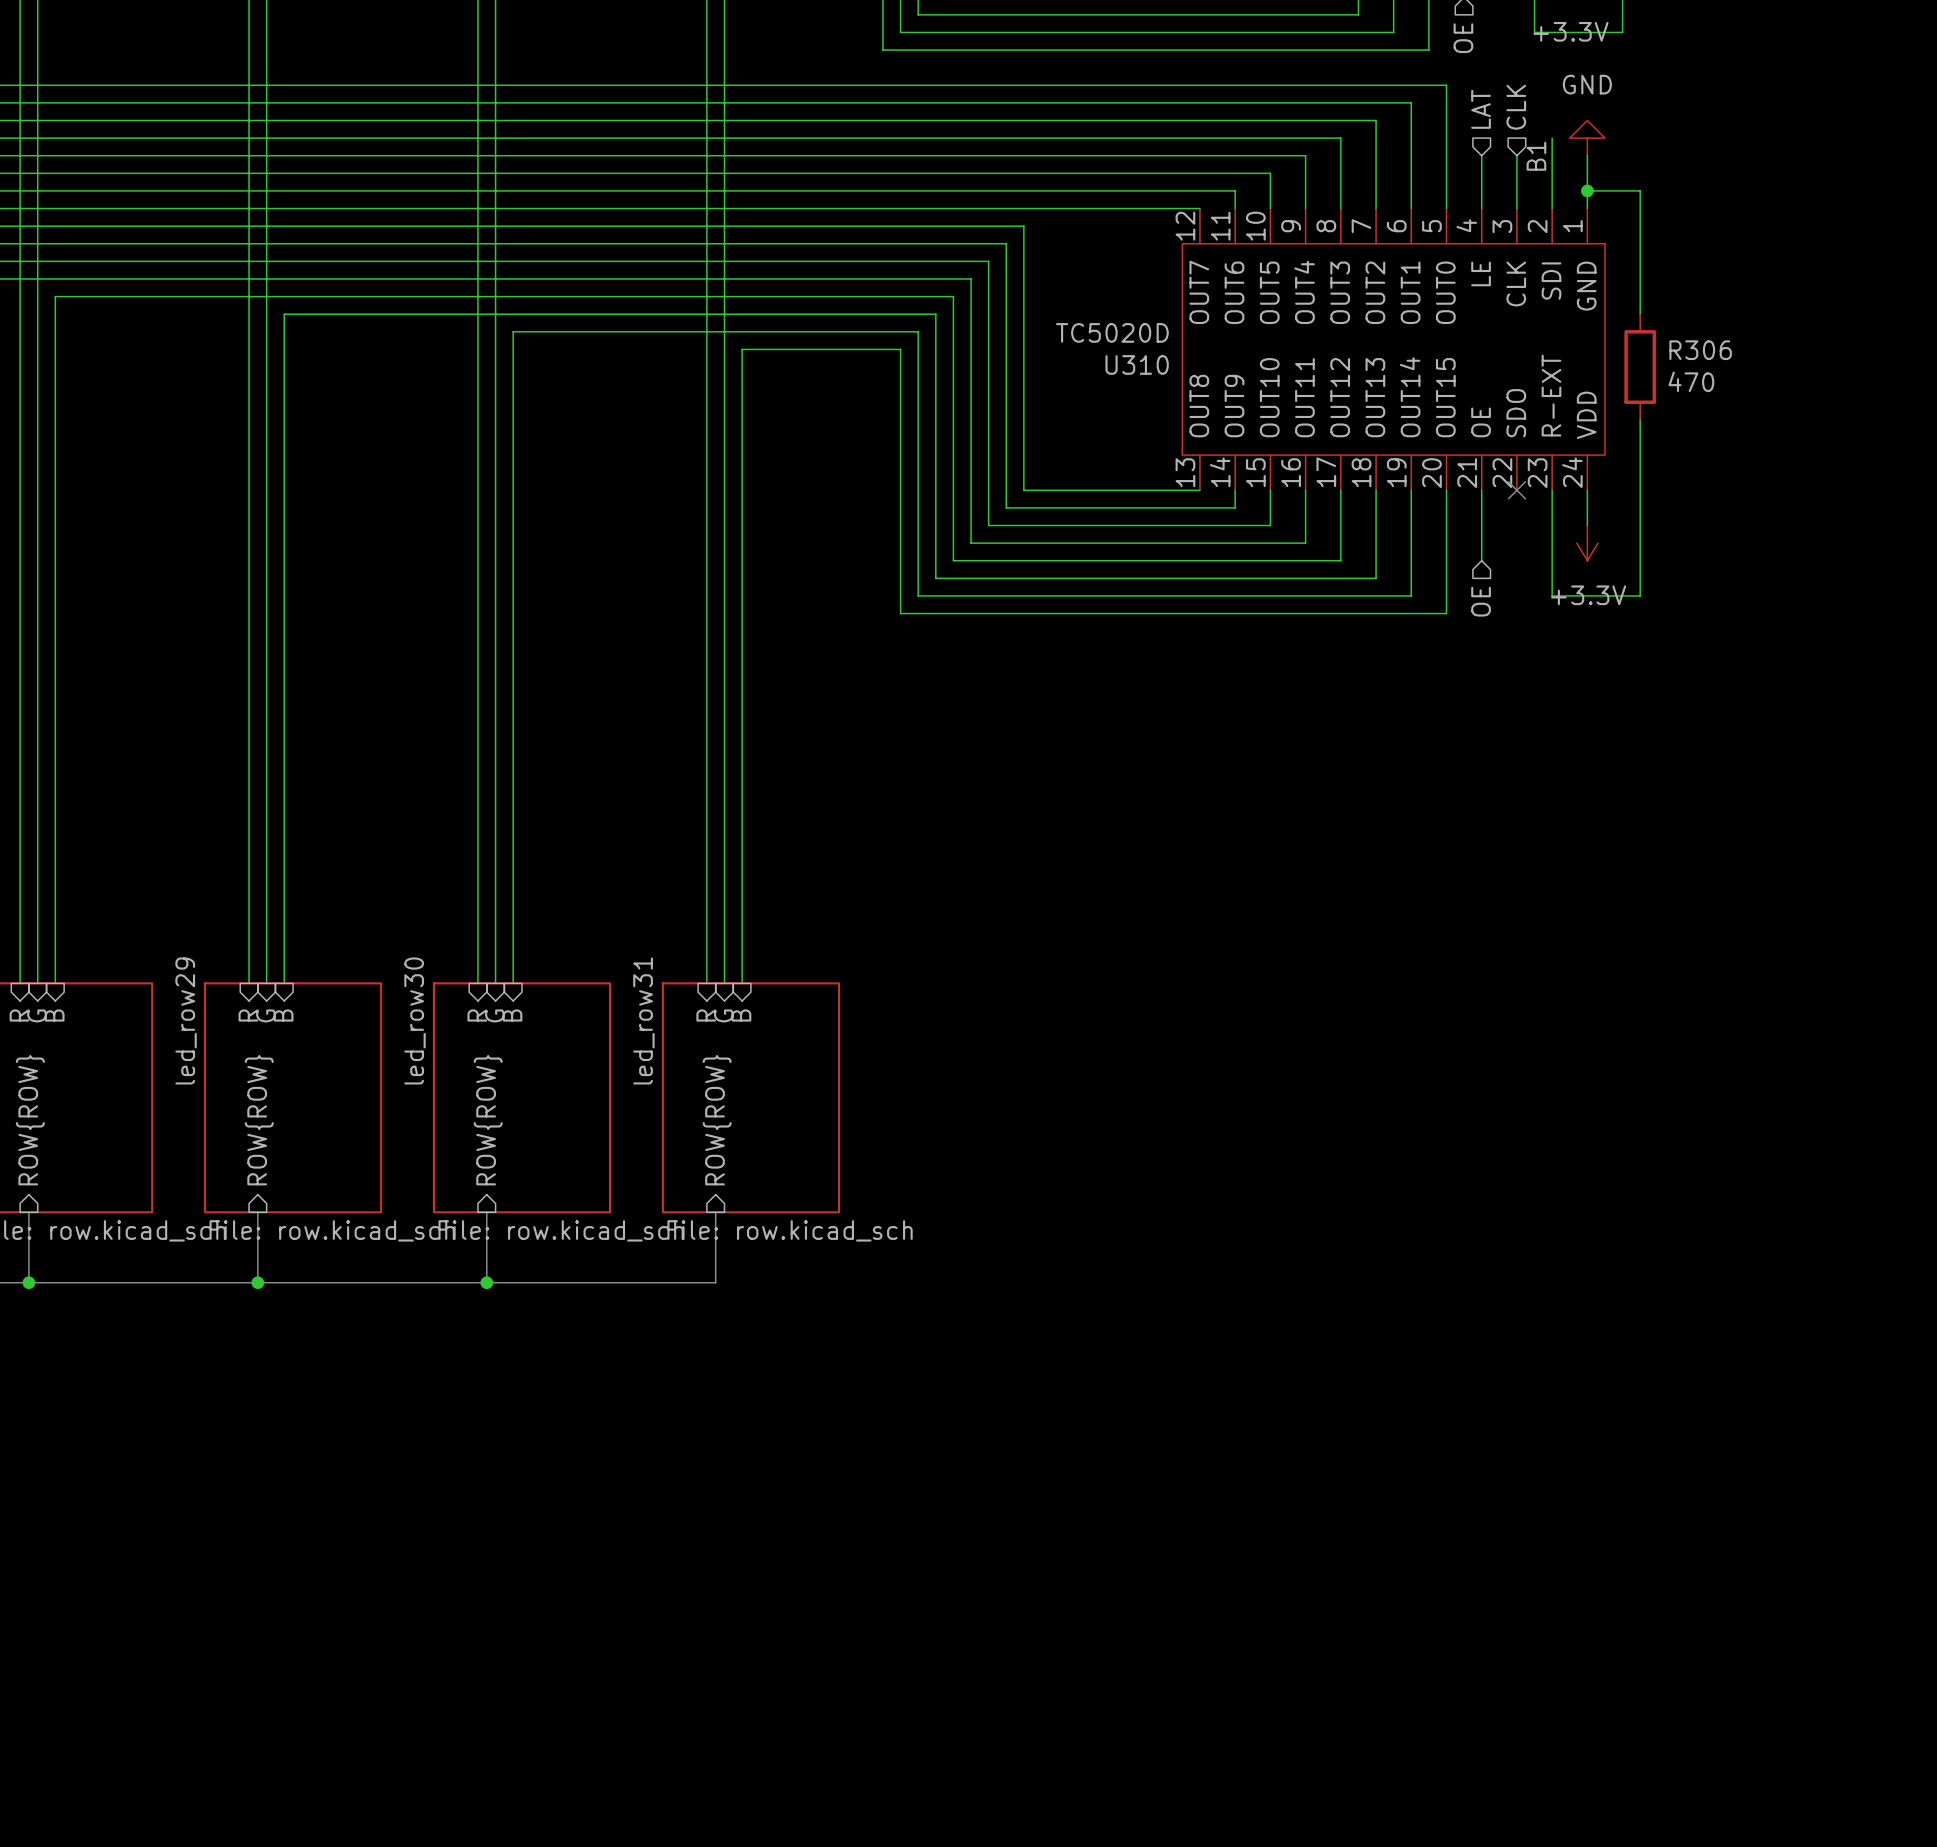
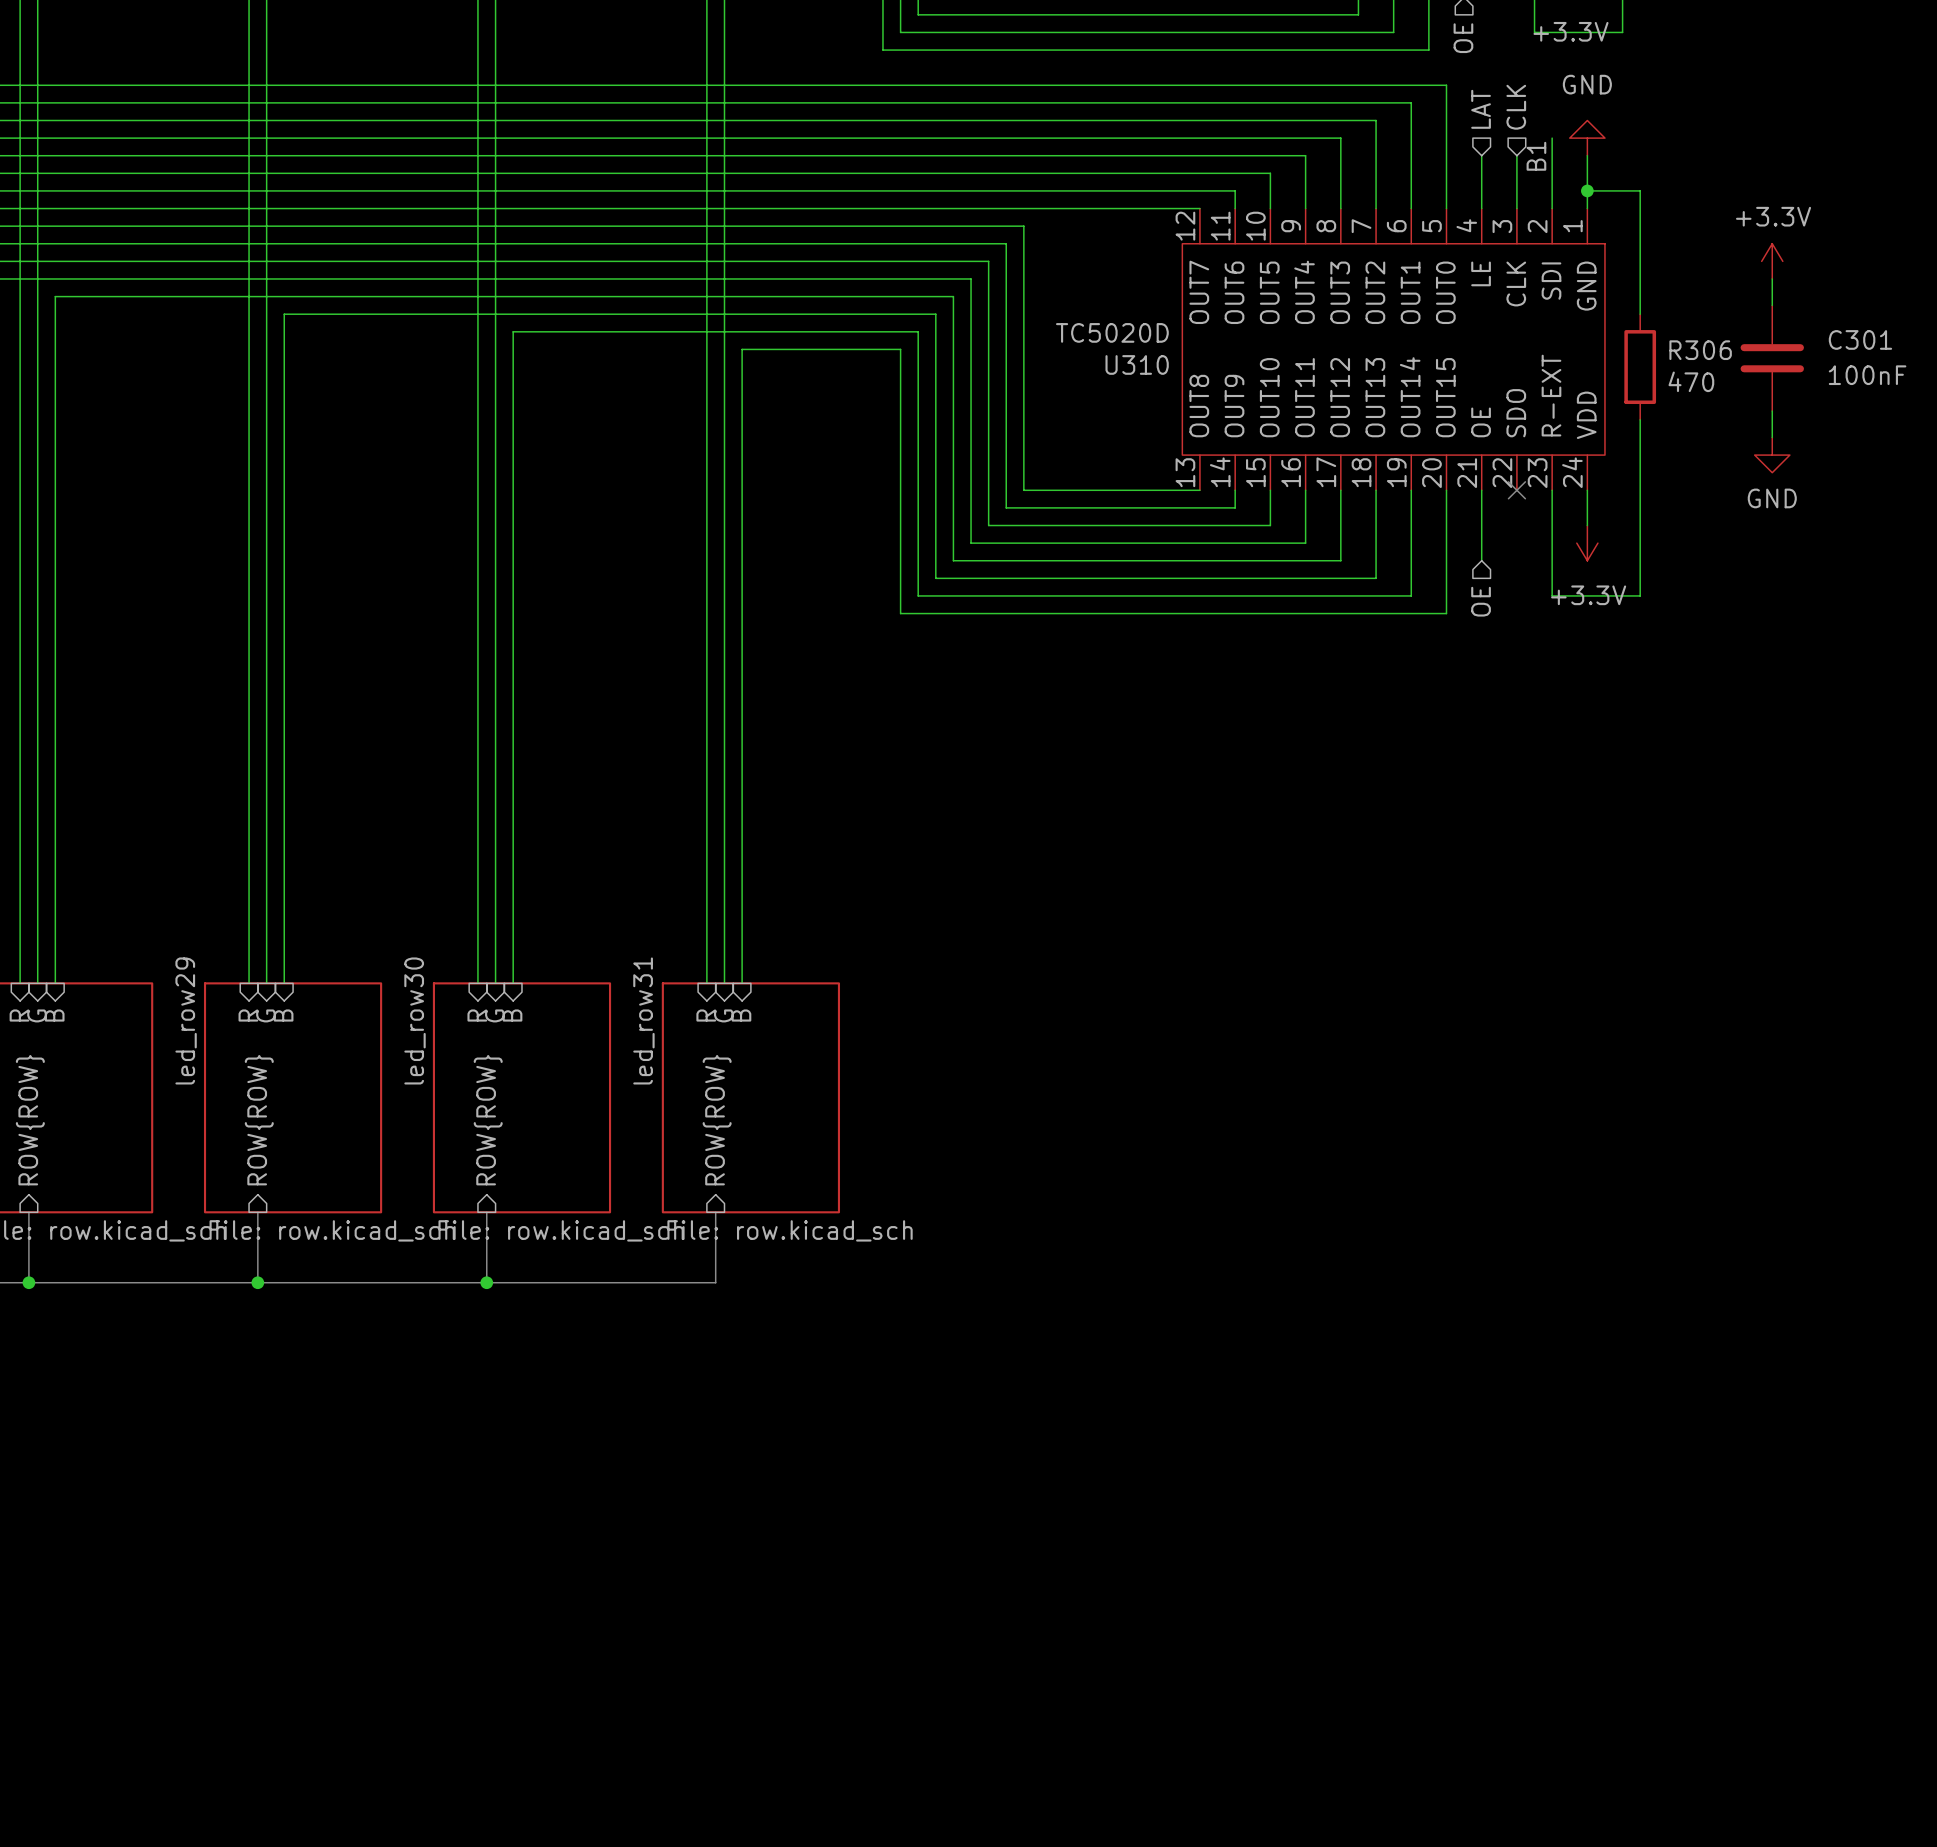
power symbol: none -> +3.3V (1772, 261)
wire: none -> (1772, 278) (1772, 305)
C301: none -> 100nF (1772, 358)
wire: none -> (1772, 411) (1772, 437)
power symbol: none -> GND (1772, 455)

